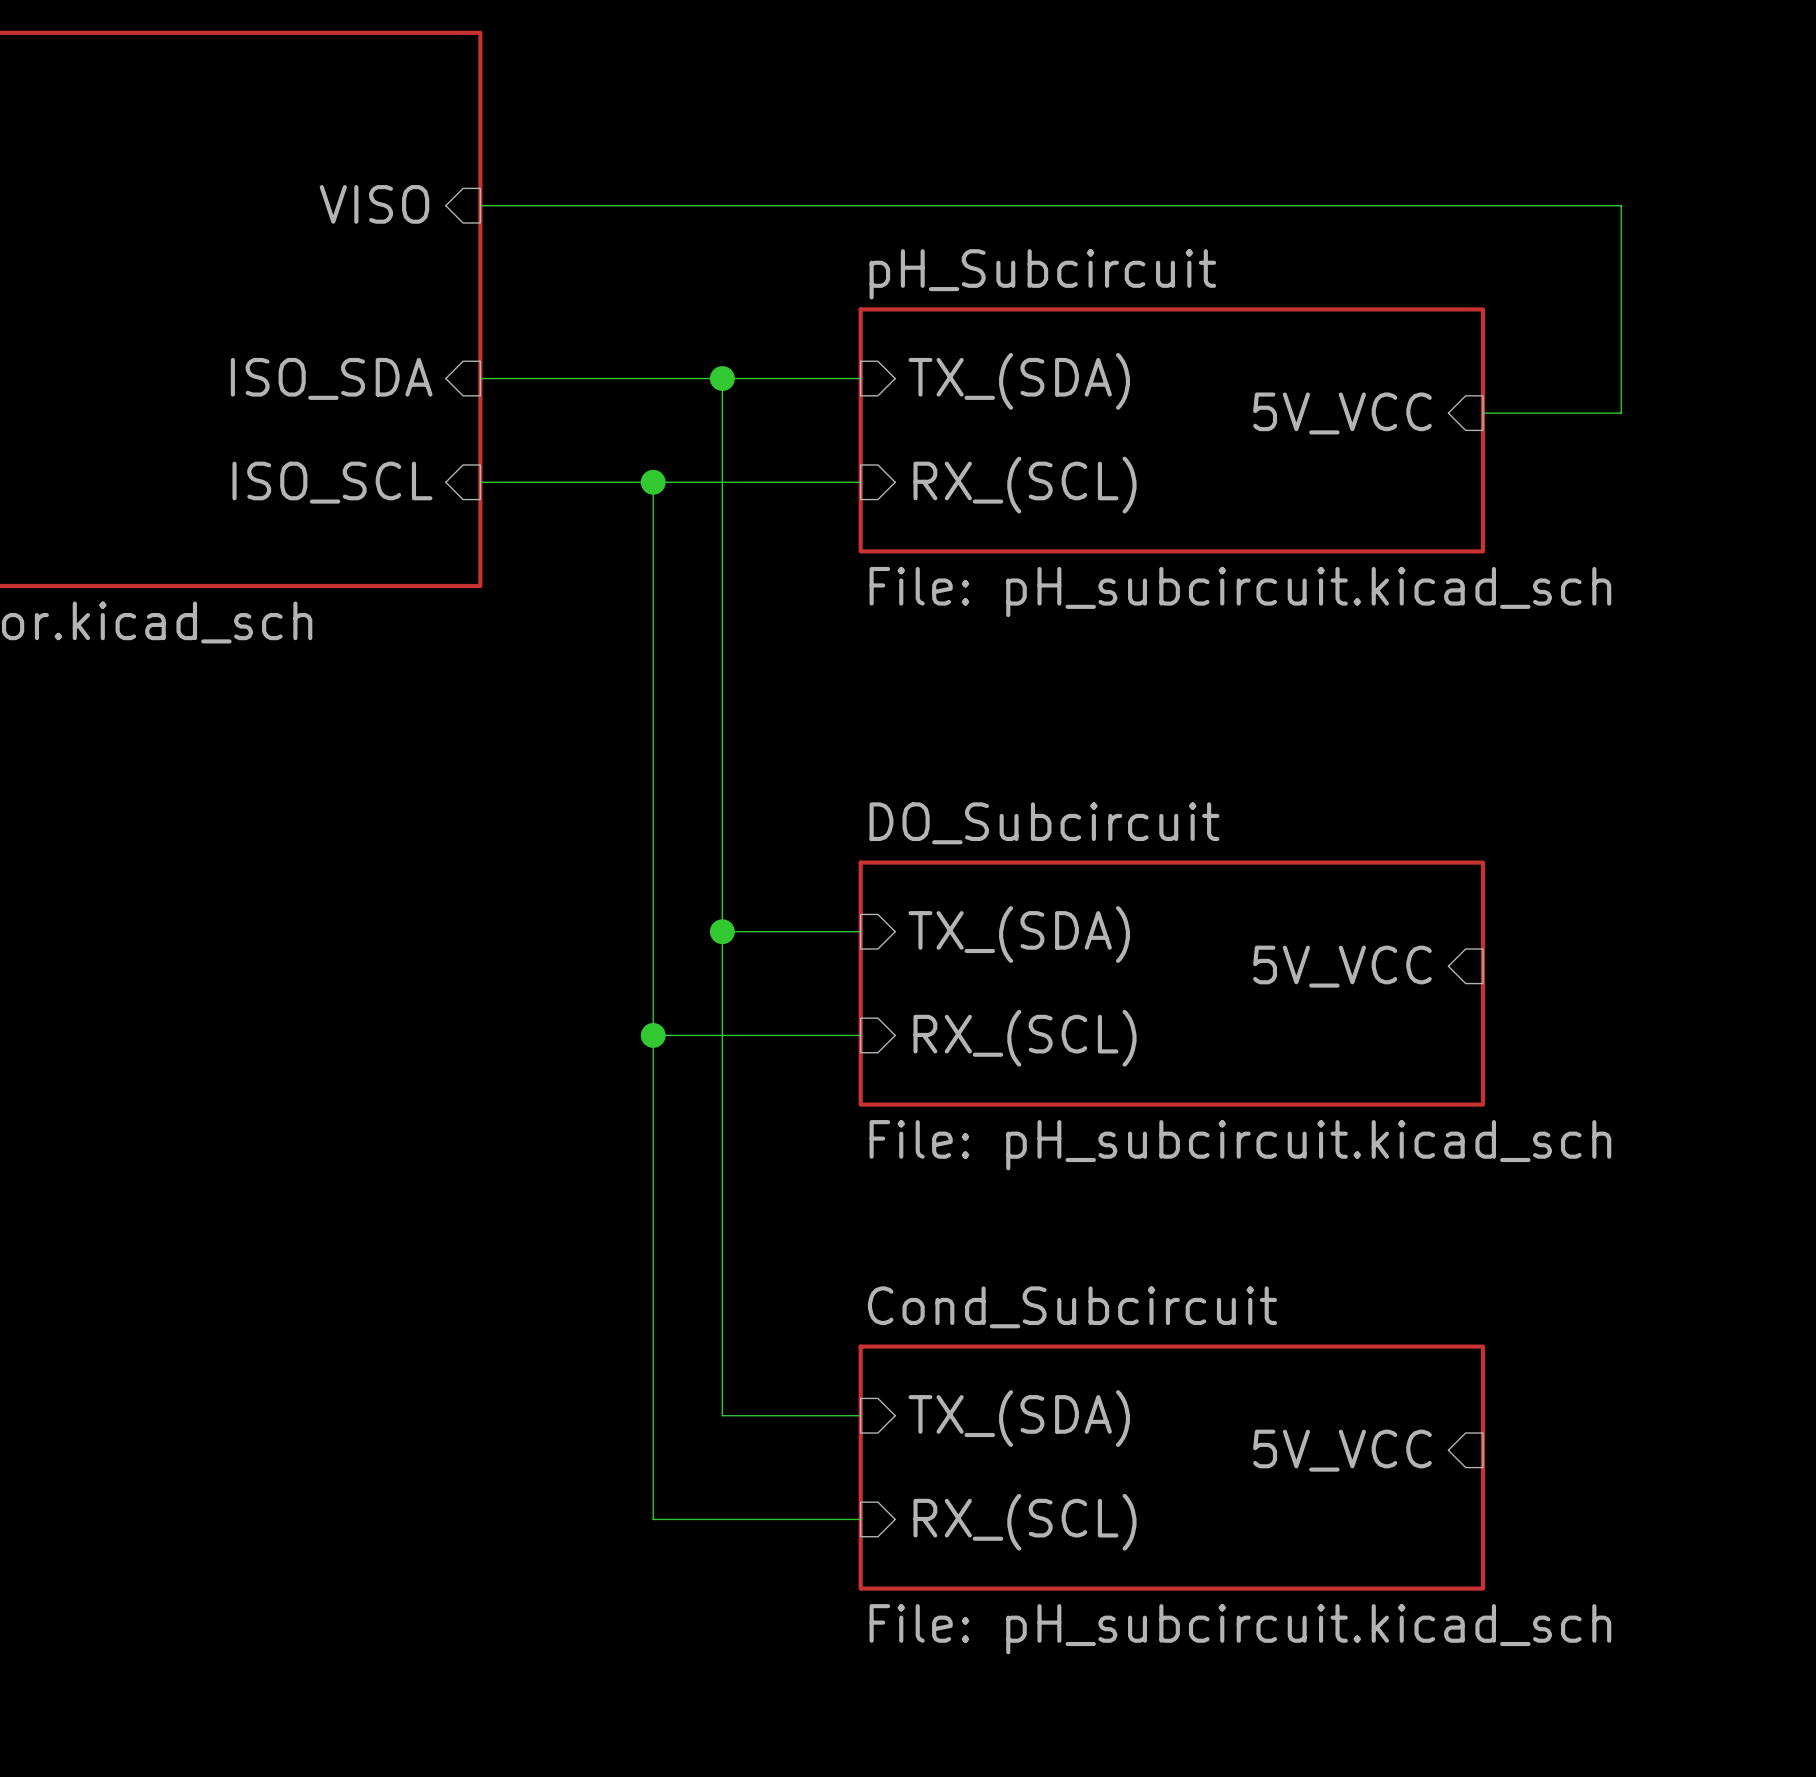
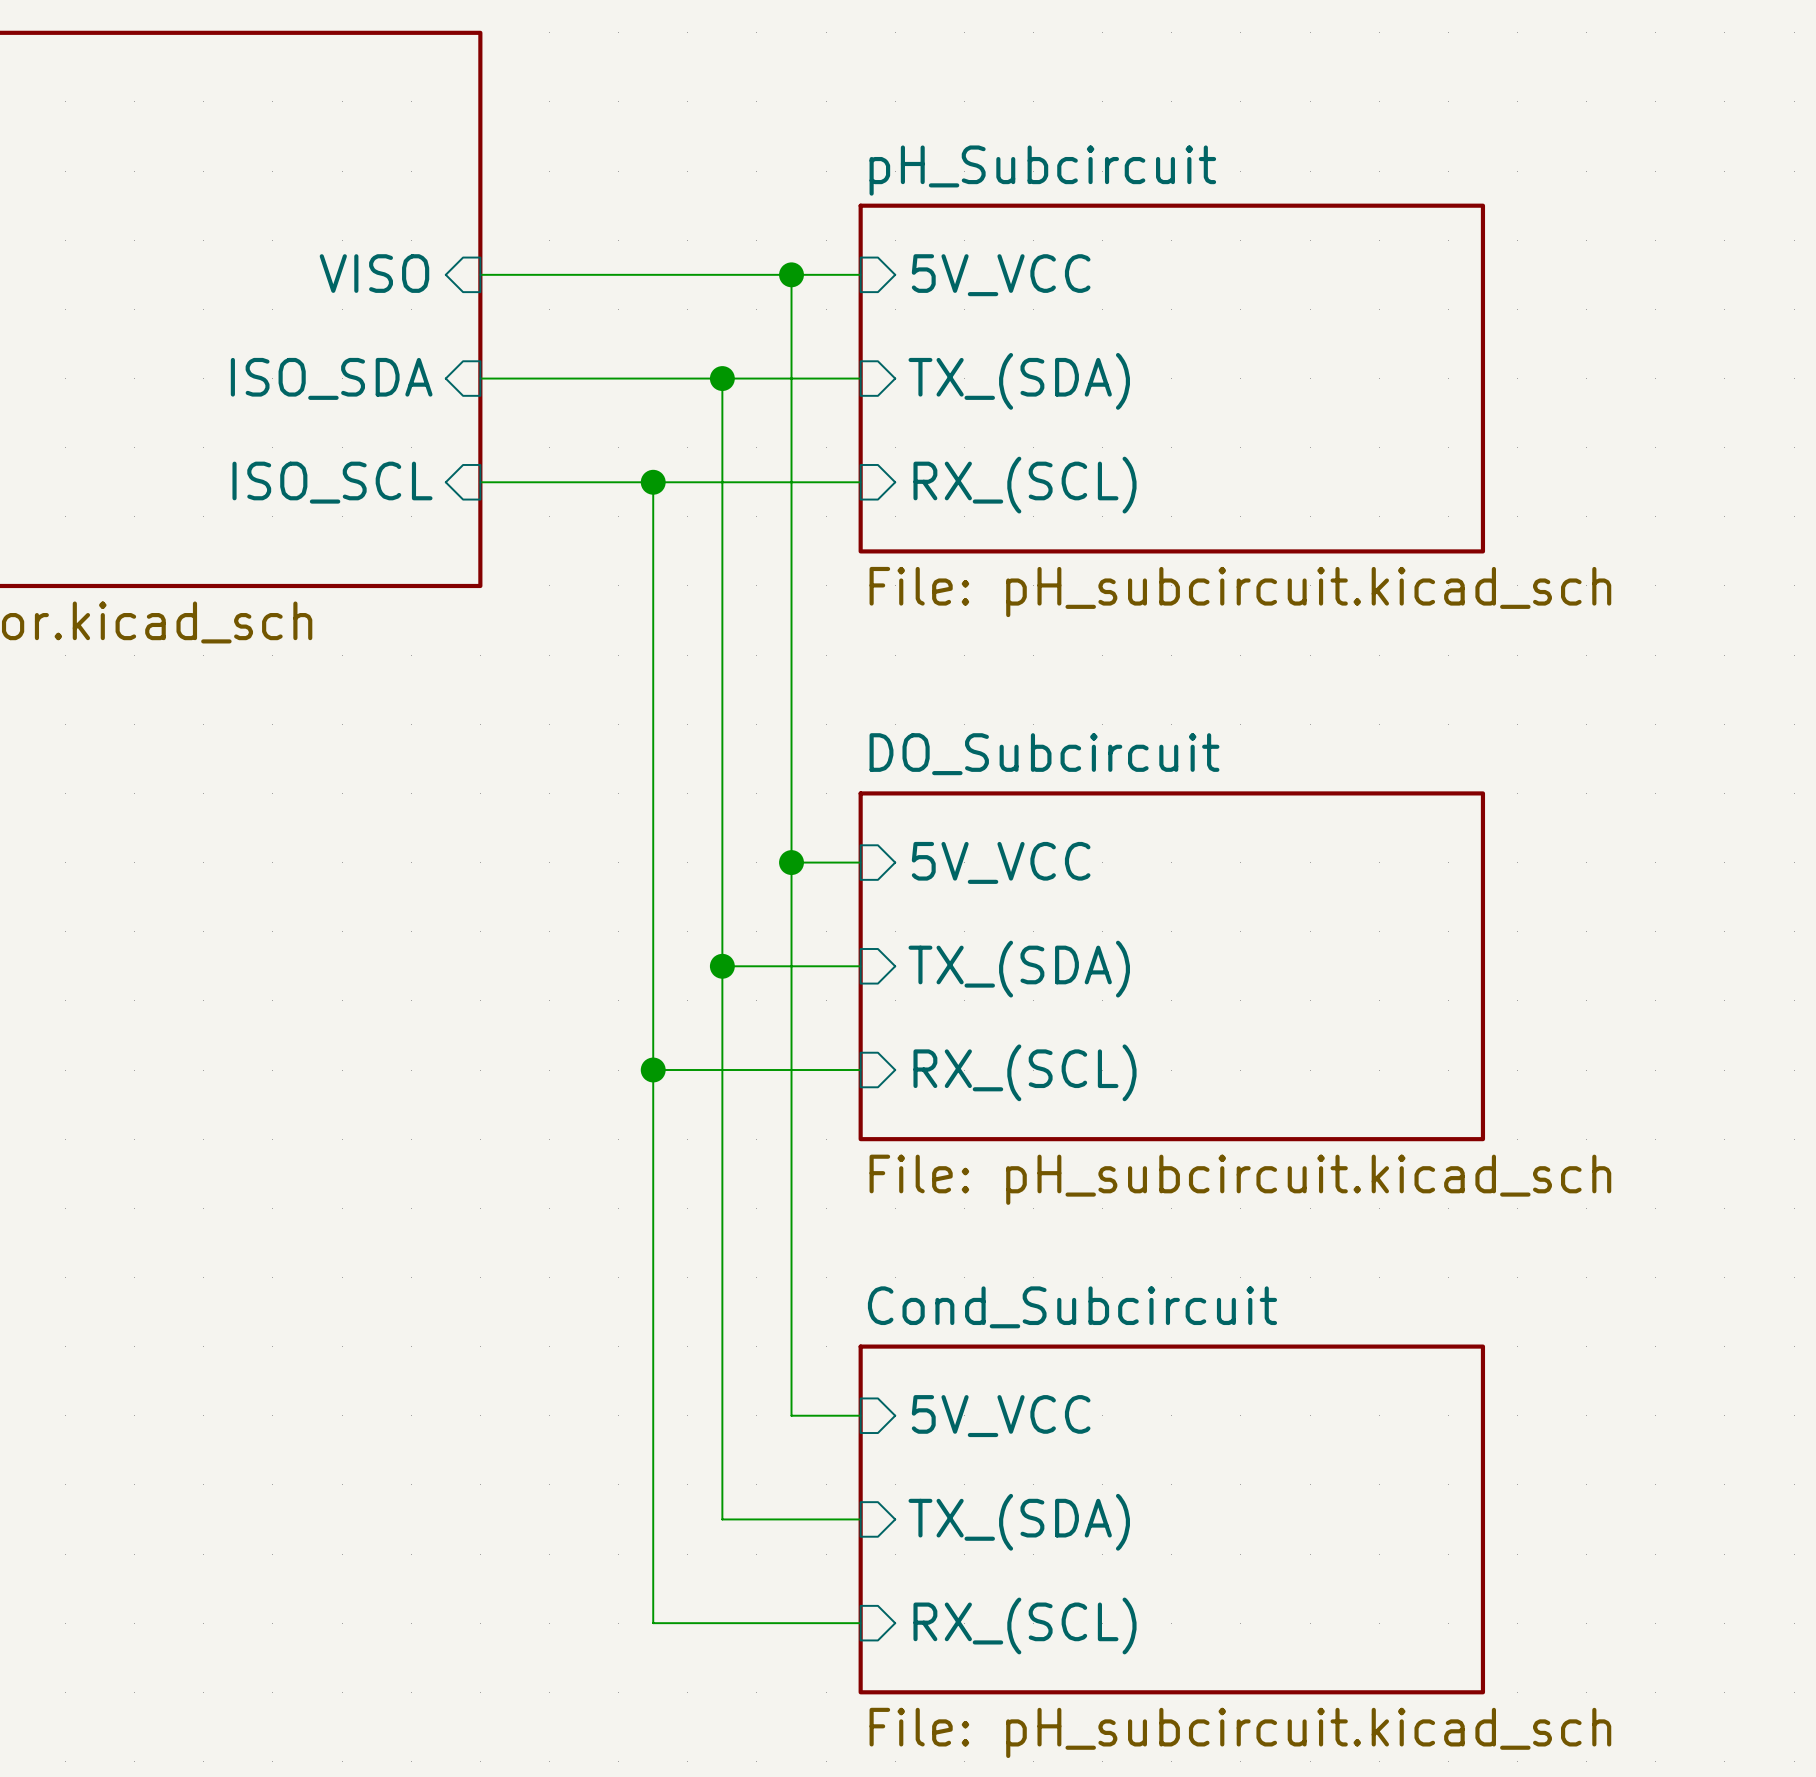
sheet pin position: VISO (374, 204) -> VISO (374, 273)
wire: (480, 205) (1621, 205) (1621, 413) (1482, 413) -> none
wire: none -> (480, 274) (860, 274)
wire: none -> (791, 274) (791, 1415)
junction: none -> (791, 274)
sheet pin: none -> 5V_VCC (1001, 275)
sheet pH_Subcircuit: none -> File: pH_subcircuit.kicad_sch (1171, 378)
sheet pin: 5V_VCC (1342, 413) -> none
sheet pH_Subcircuit: File: pH_subcircuit.kicad_sch (1171, 430) -> none
sheet DO_Subcircuit shape: [858, 860, 1486, 1107] -> [858, 791, 1486, 1142]
wire: none -> (791, 862) (860, 862)
junction: none -> (791, 862)
sheet pin: none -> 5V_VCC (1001, 862)
wire: (722, 931) (860, 931) -> (722, 966) (860, 966)
junction position: (722, 931) -> (722, 966)
sheet pin position: TX_(SDA) (1019, 934) -> TX_(SDA) (1019, 969)
sheet pin: 5V_VCC (1342, 966) -> none
wire: (653, 1035) (860, 1035) -> (653, 1070) (860, 1070)
junction position: (653, 1035) -> (653, 1070)
sheet pin position: RX_(SCL) (1025, 1038) -> RX_(SCL) (1025, 1072)
wire: (722, 1415) (791, 1415) -> (722, 1415) (722, 1519)
sheet pin: TX_(SDA) (1019, 1418) -> 5V_VCC (1001, 1416)
sheet pin: 5V_VCC (1342, 1450) -> none
sheet Cond_Subcircuit: File: pH_subcircuit.kicad_sch (1171, 1467) -> none
wire: (653, 1519) (722, 1519) -> (653, 1519) (653, 1623) (860, 1623)
sheet Cond_Subcircuit: none -> File: pH_subcircuit.kicad_sch (1171, 1519)
sheet pin: RX_(SCL) (1025, 1522) -> TX_(SDA) (1019, 1522)
sheet pin: none -> RX_(SCL) (1025, 1625)

